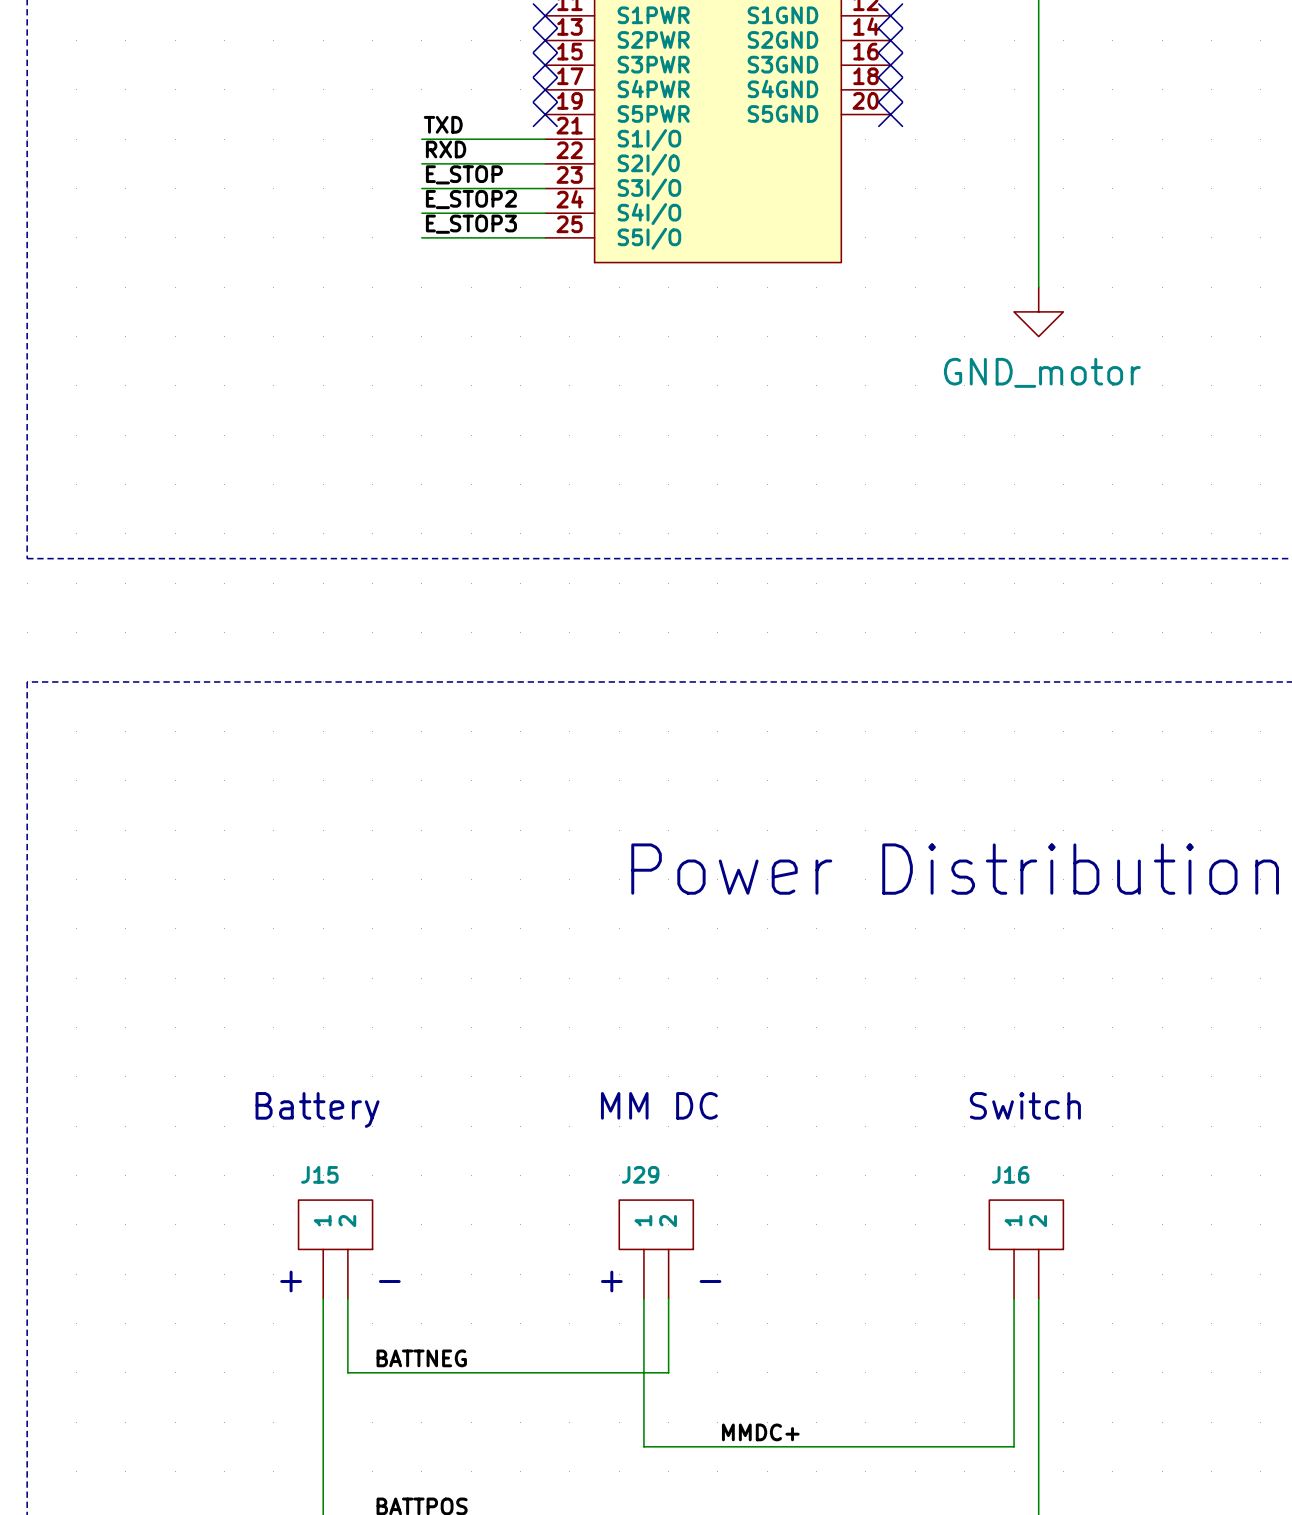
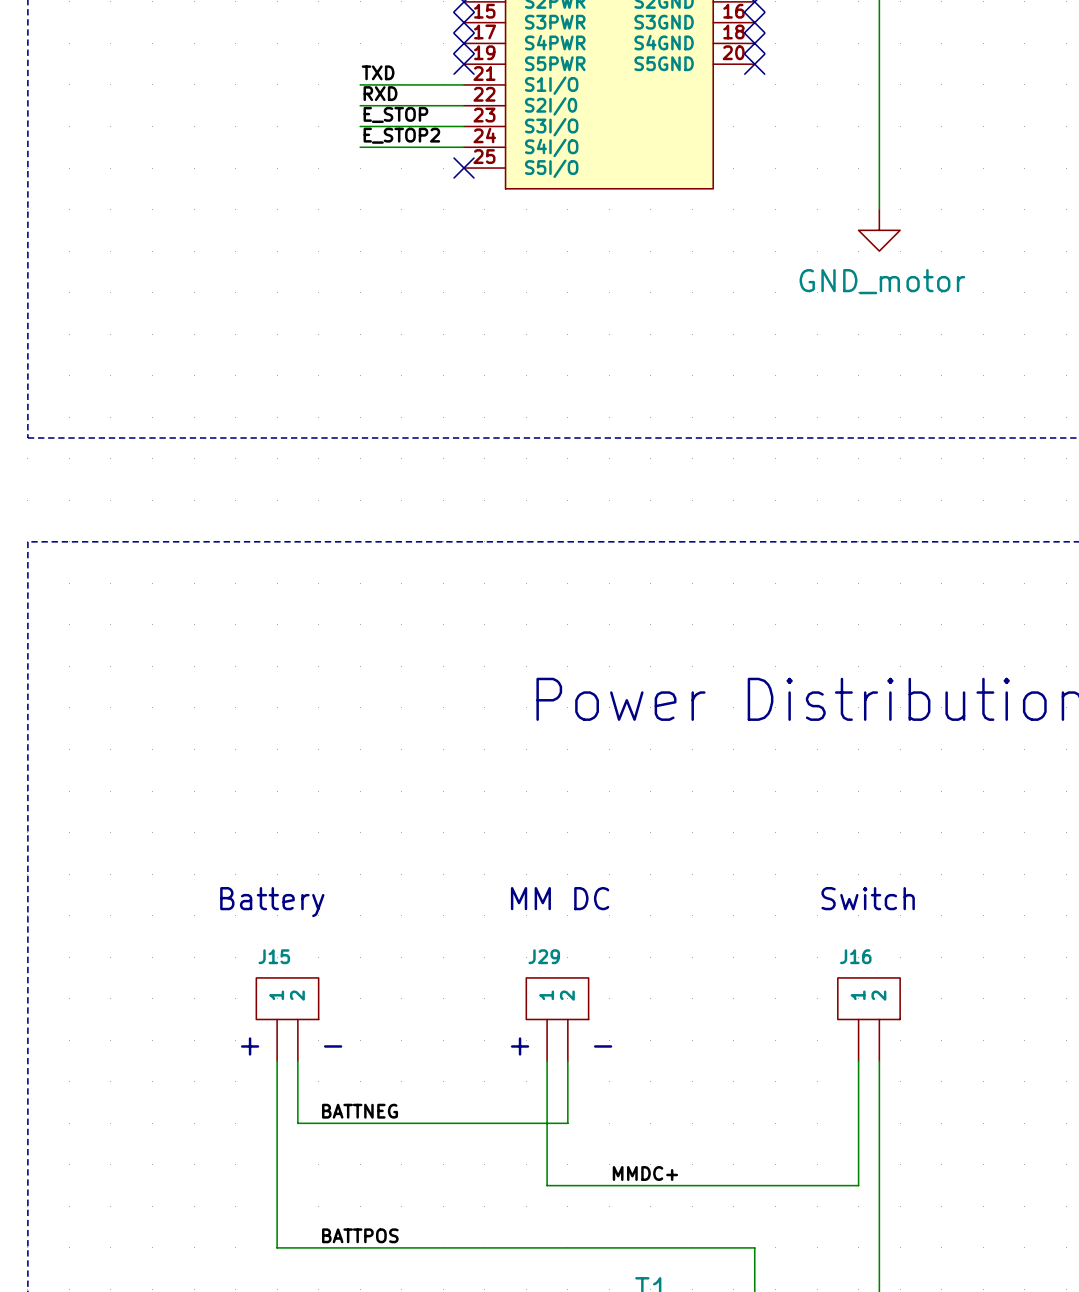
label: E_STOP3 (471, 224) -> none
wire: (421, 237) (545, 237) -> none
no-connect mark: none -> (464, 168)

